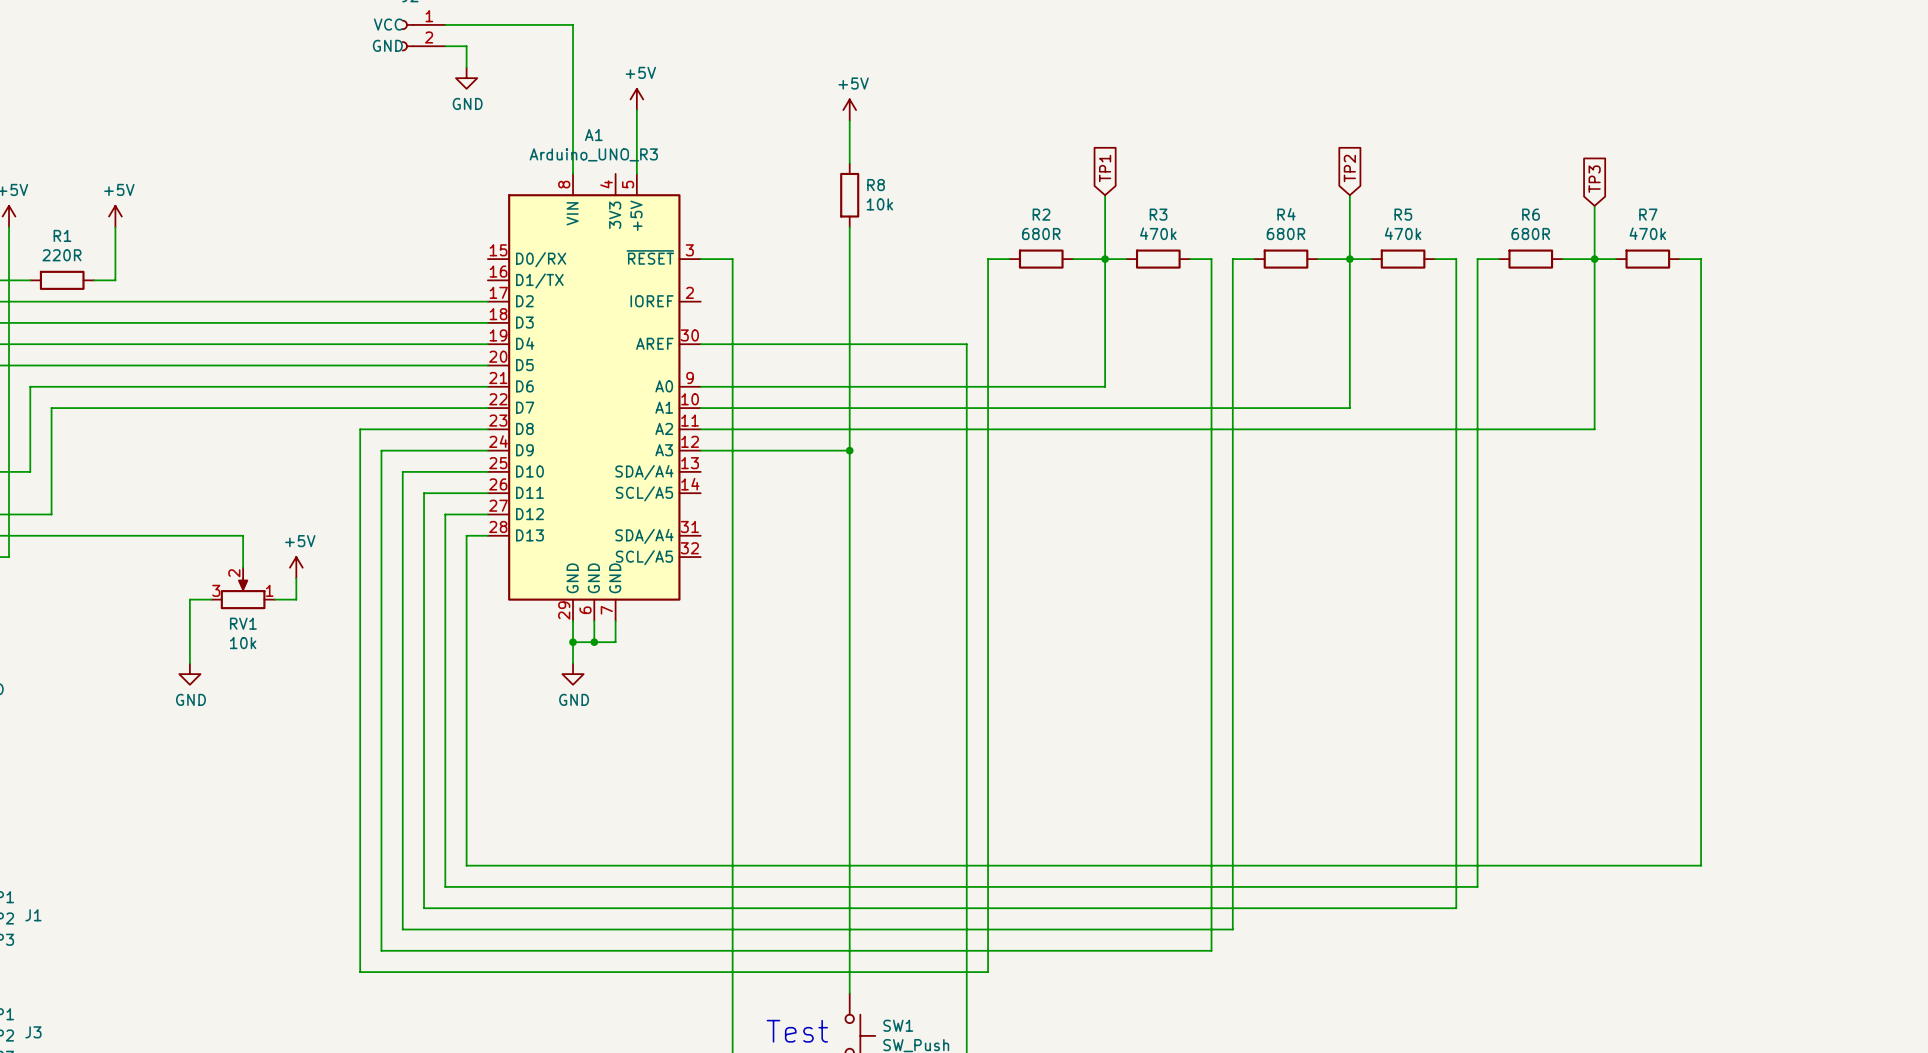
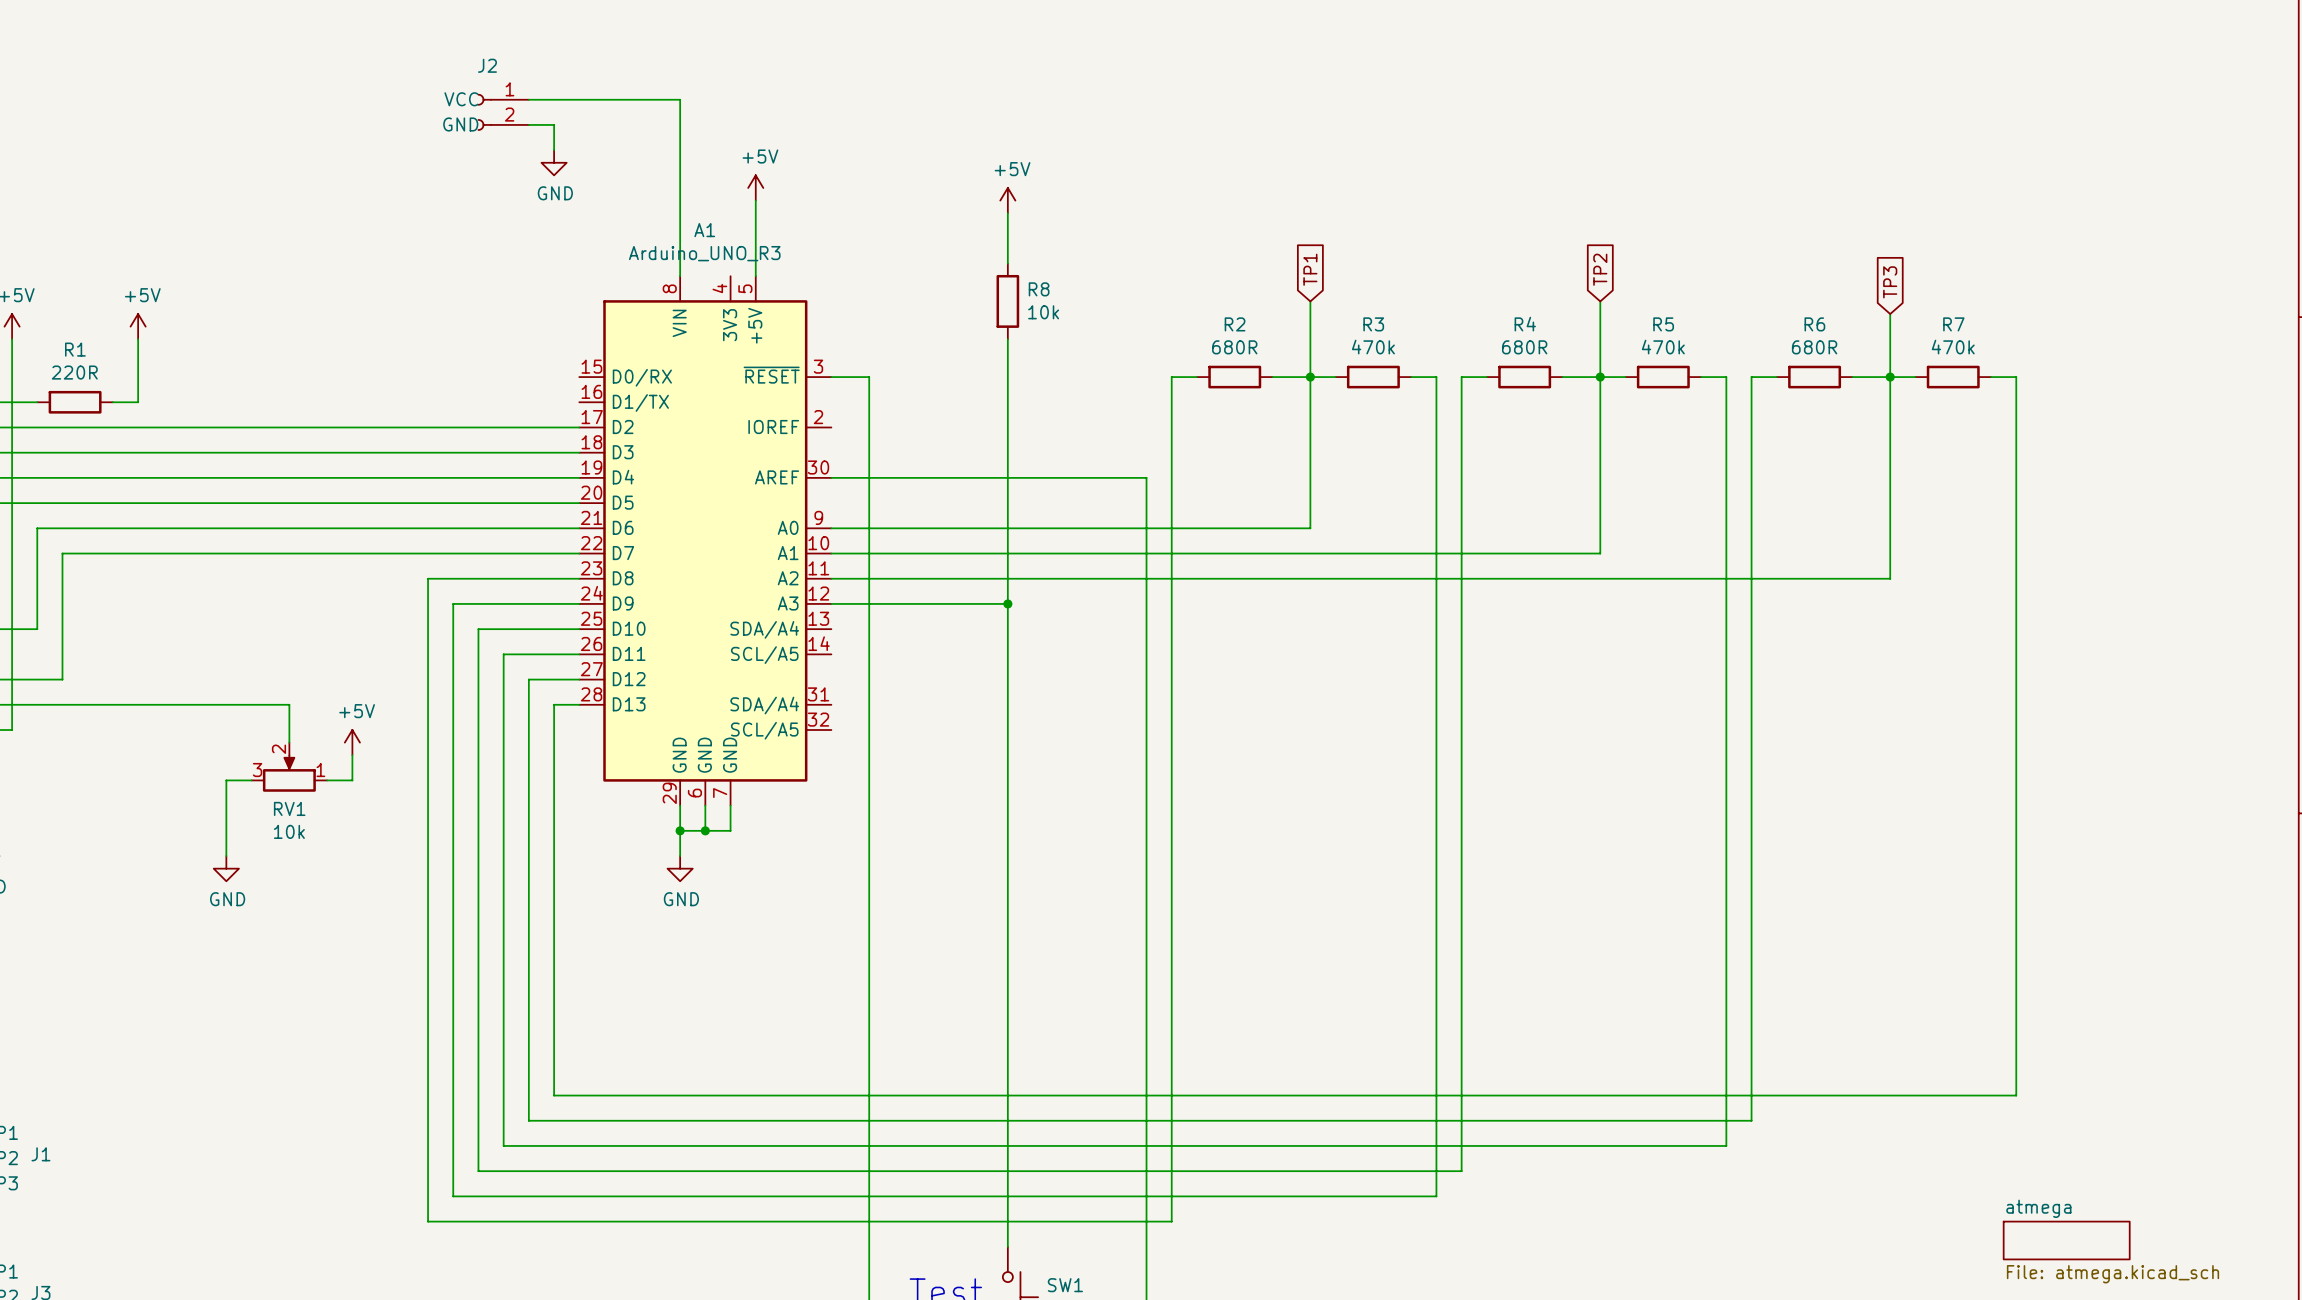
sheet atmega: none -> File: atmega.kicad_sch (2066, 1240)

